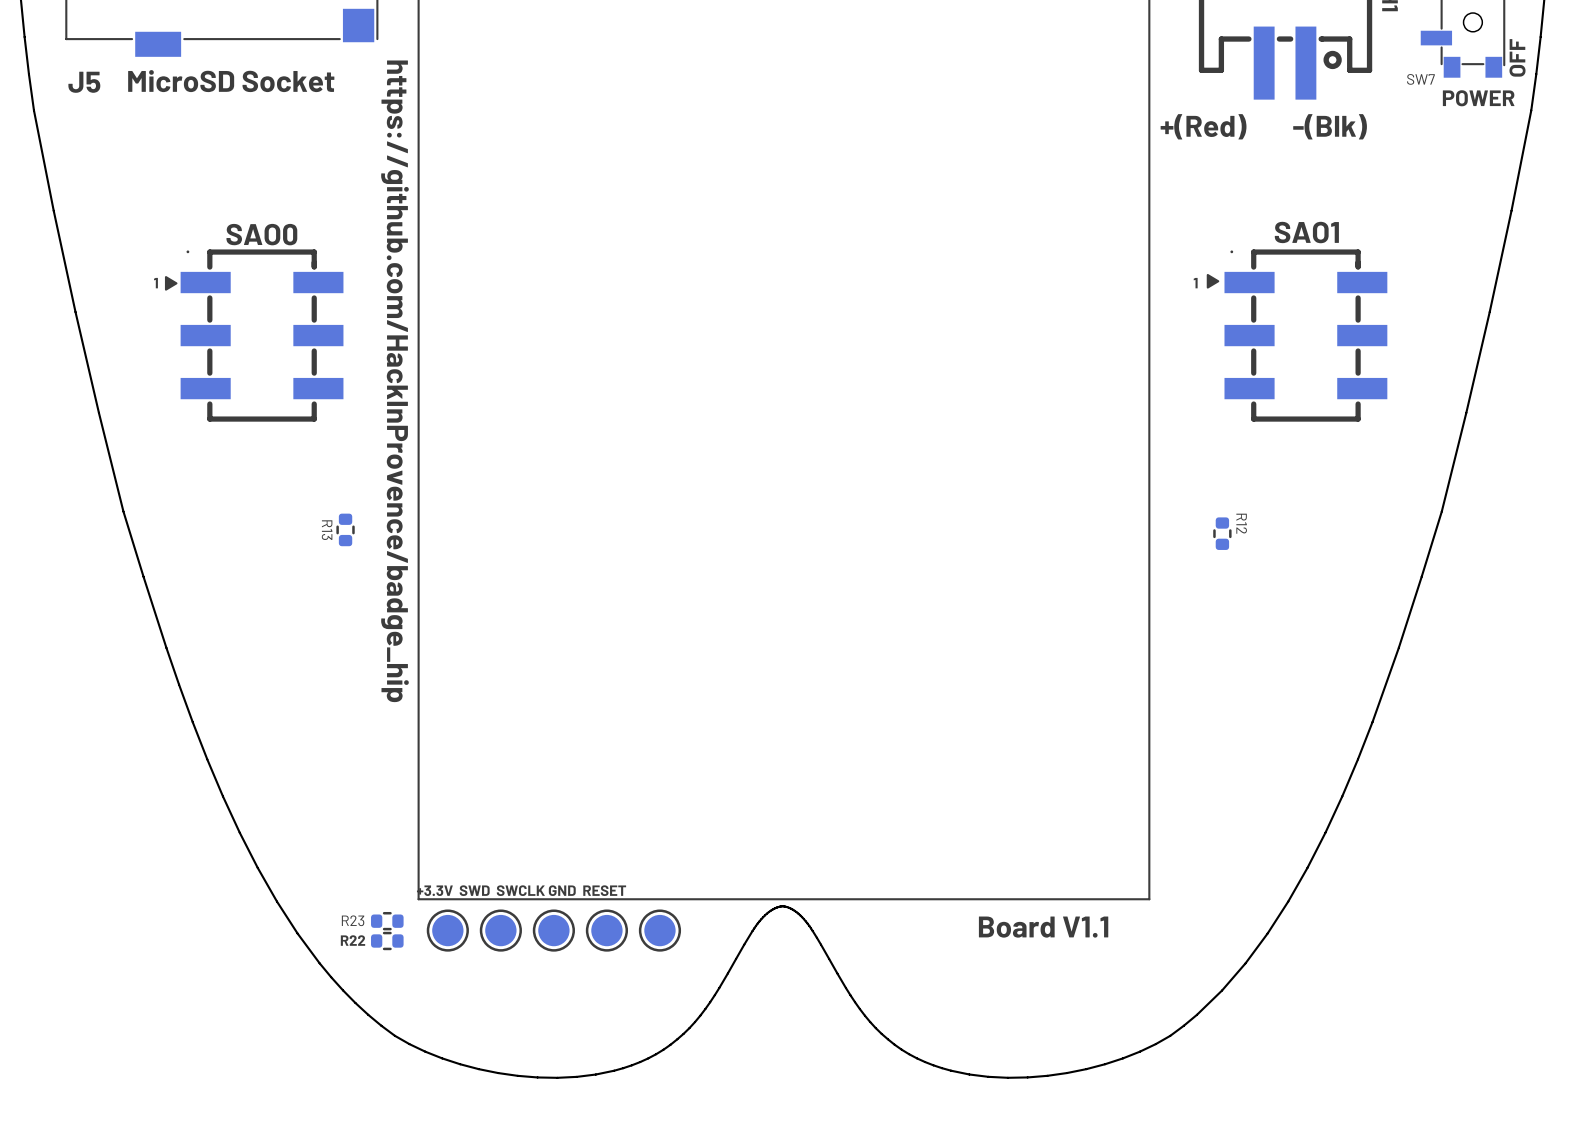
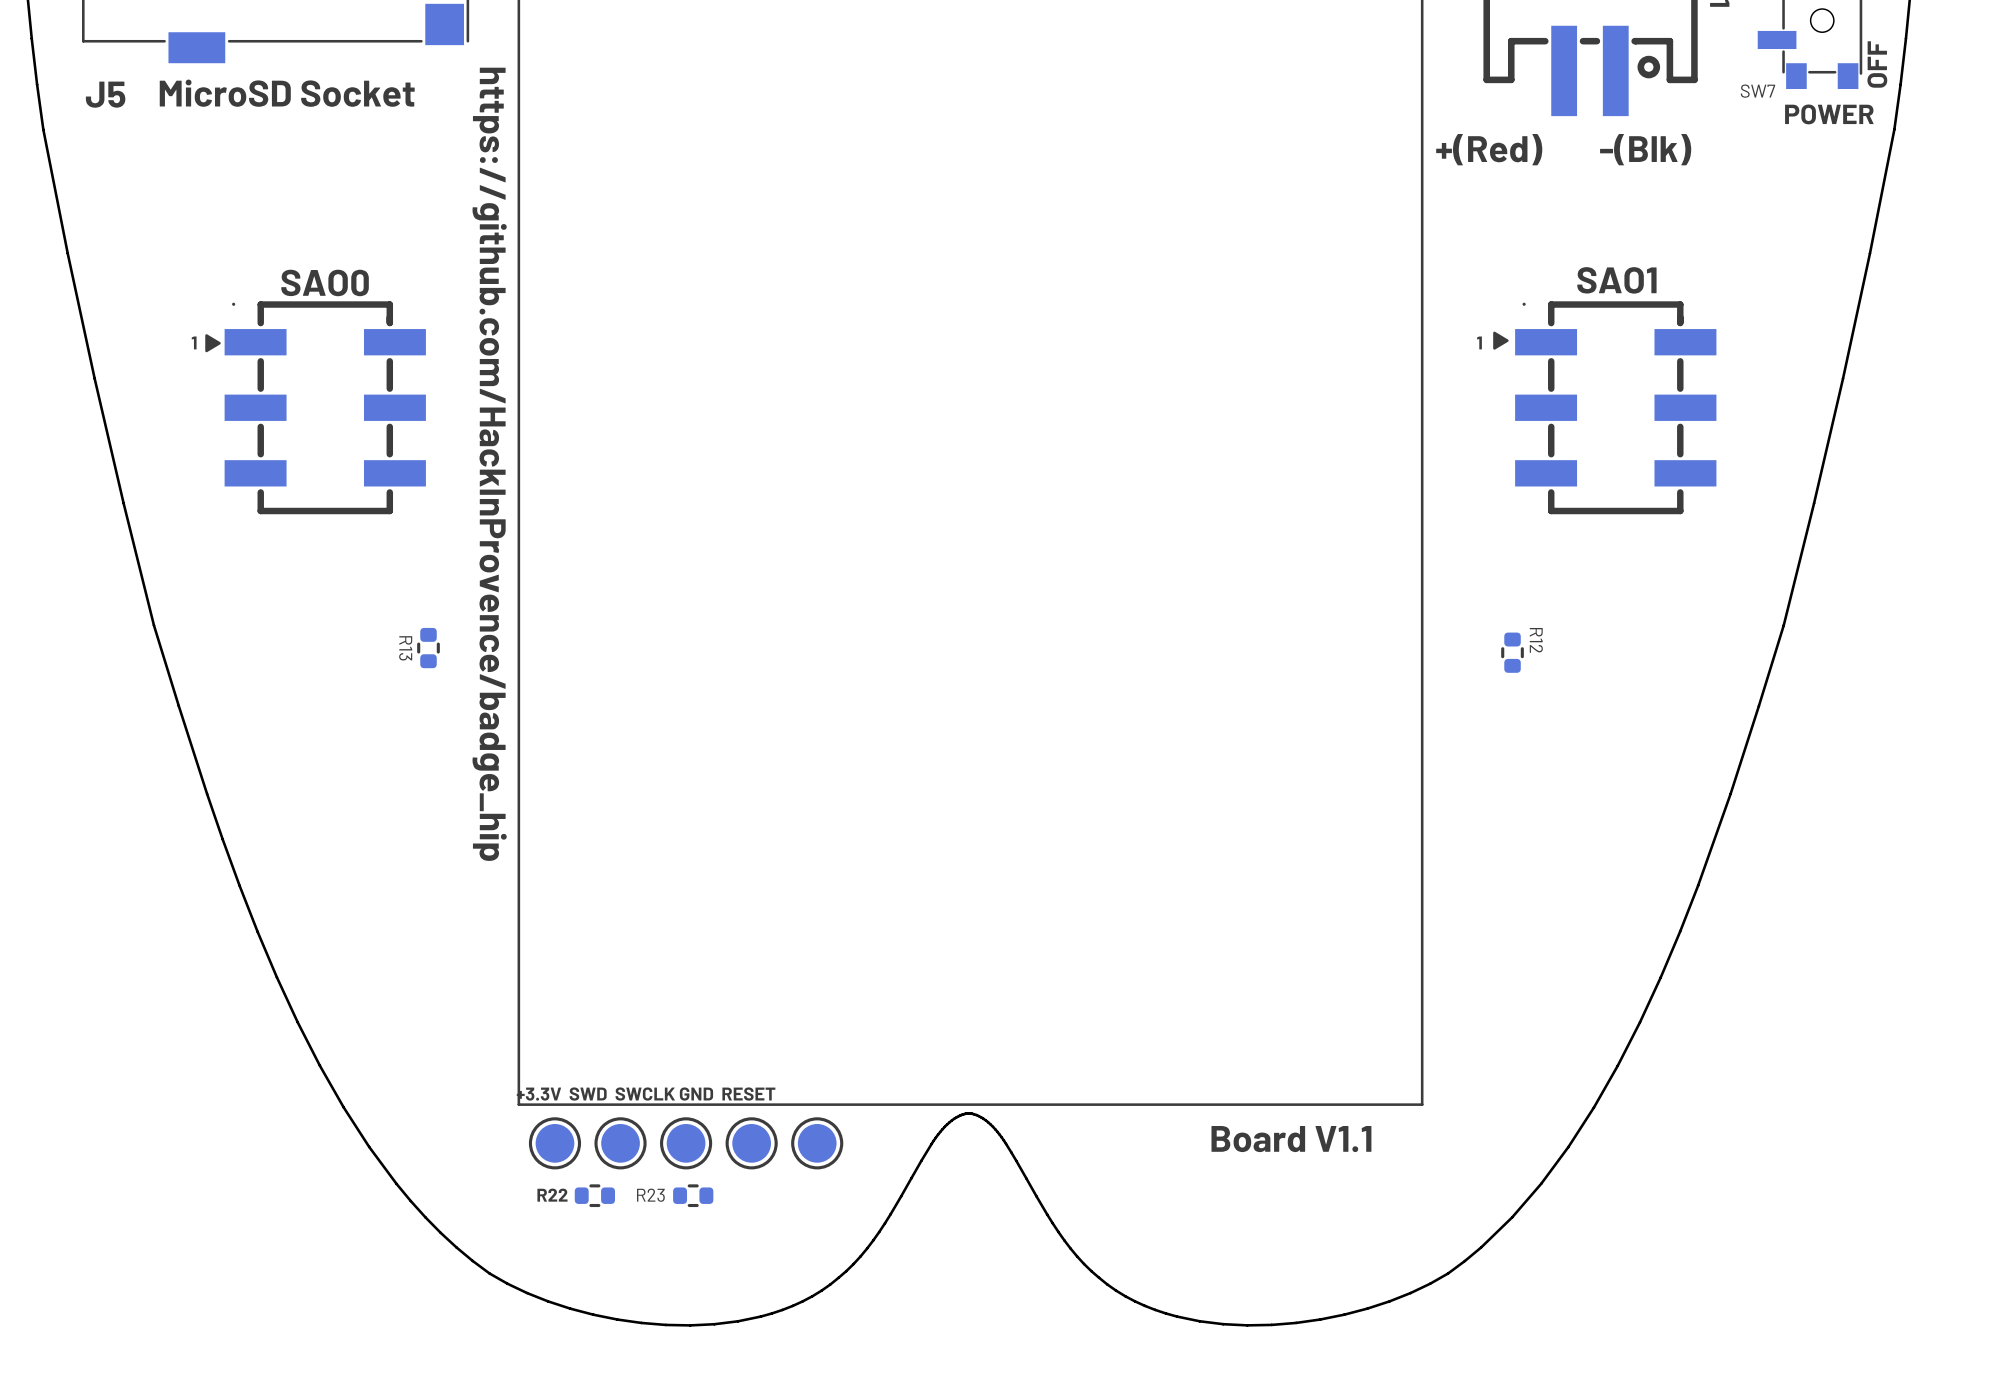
R23 position: (387, 921) -> (693, 1195)
R22 position: (387, 941) -> (594, 1195)

